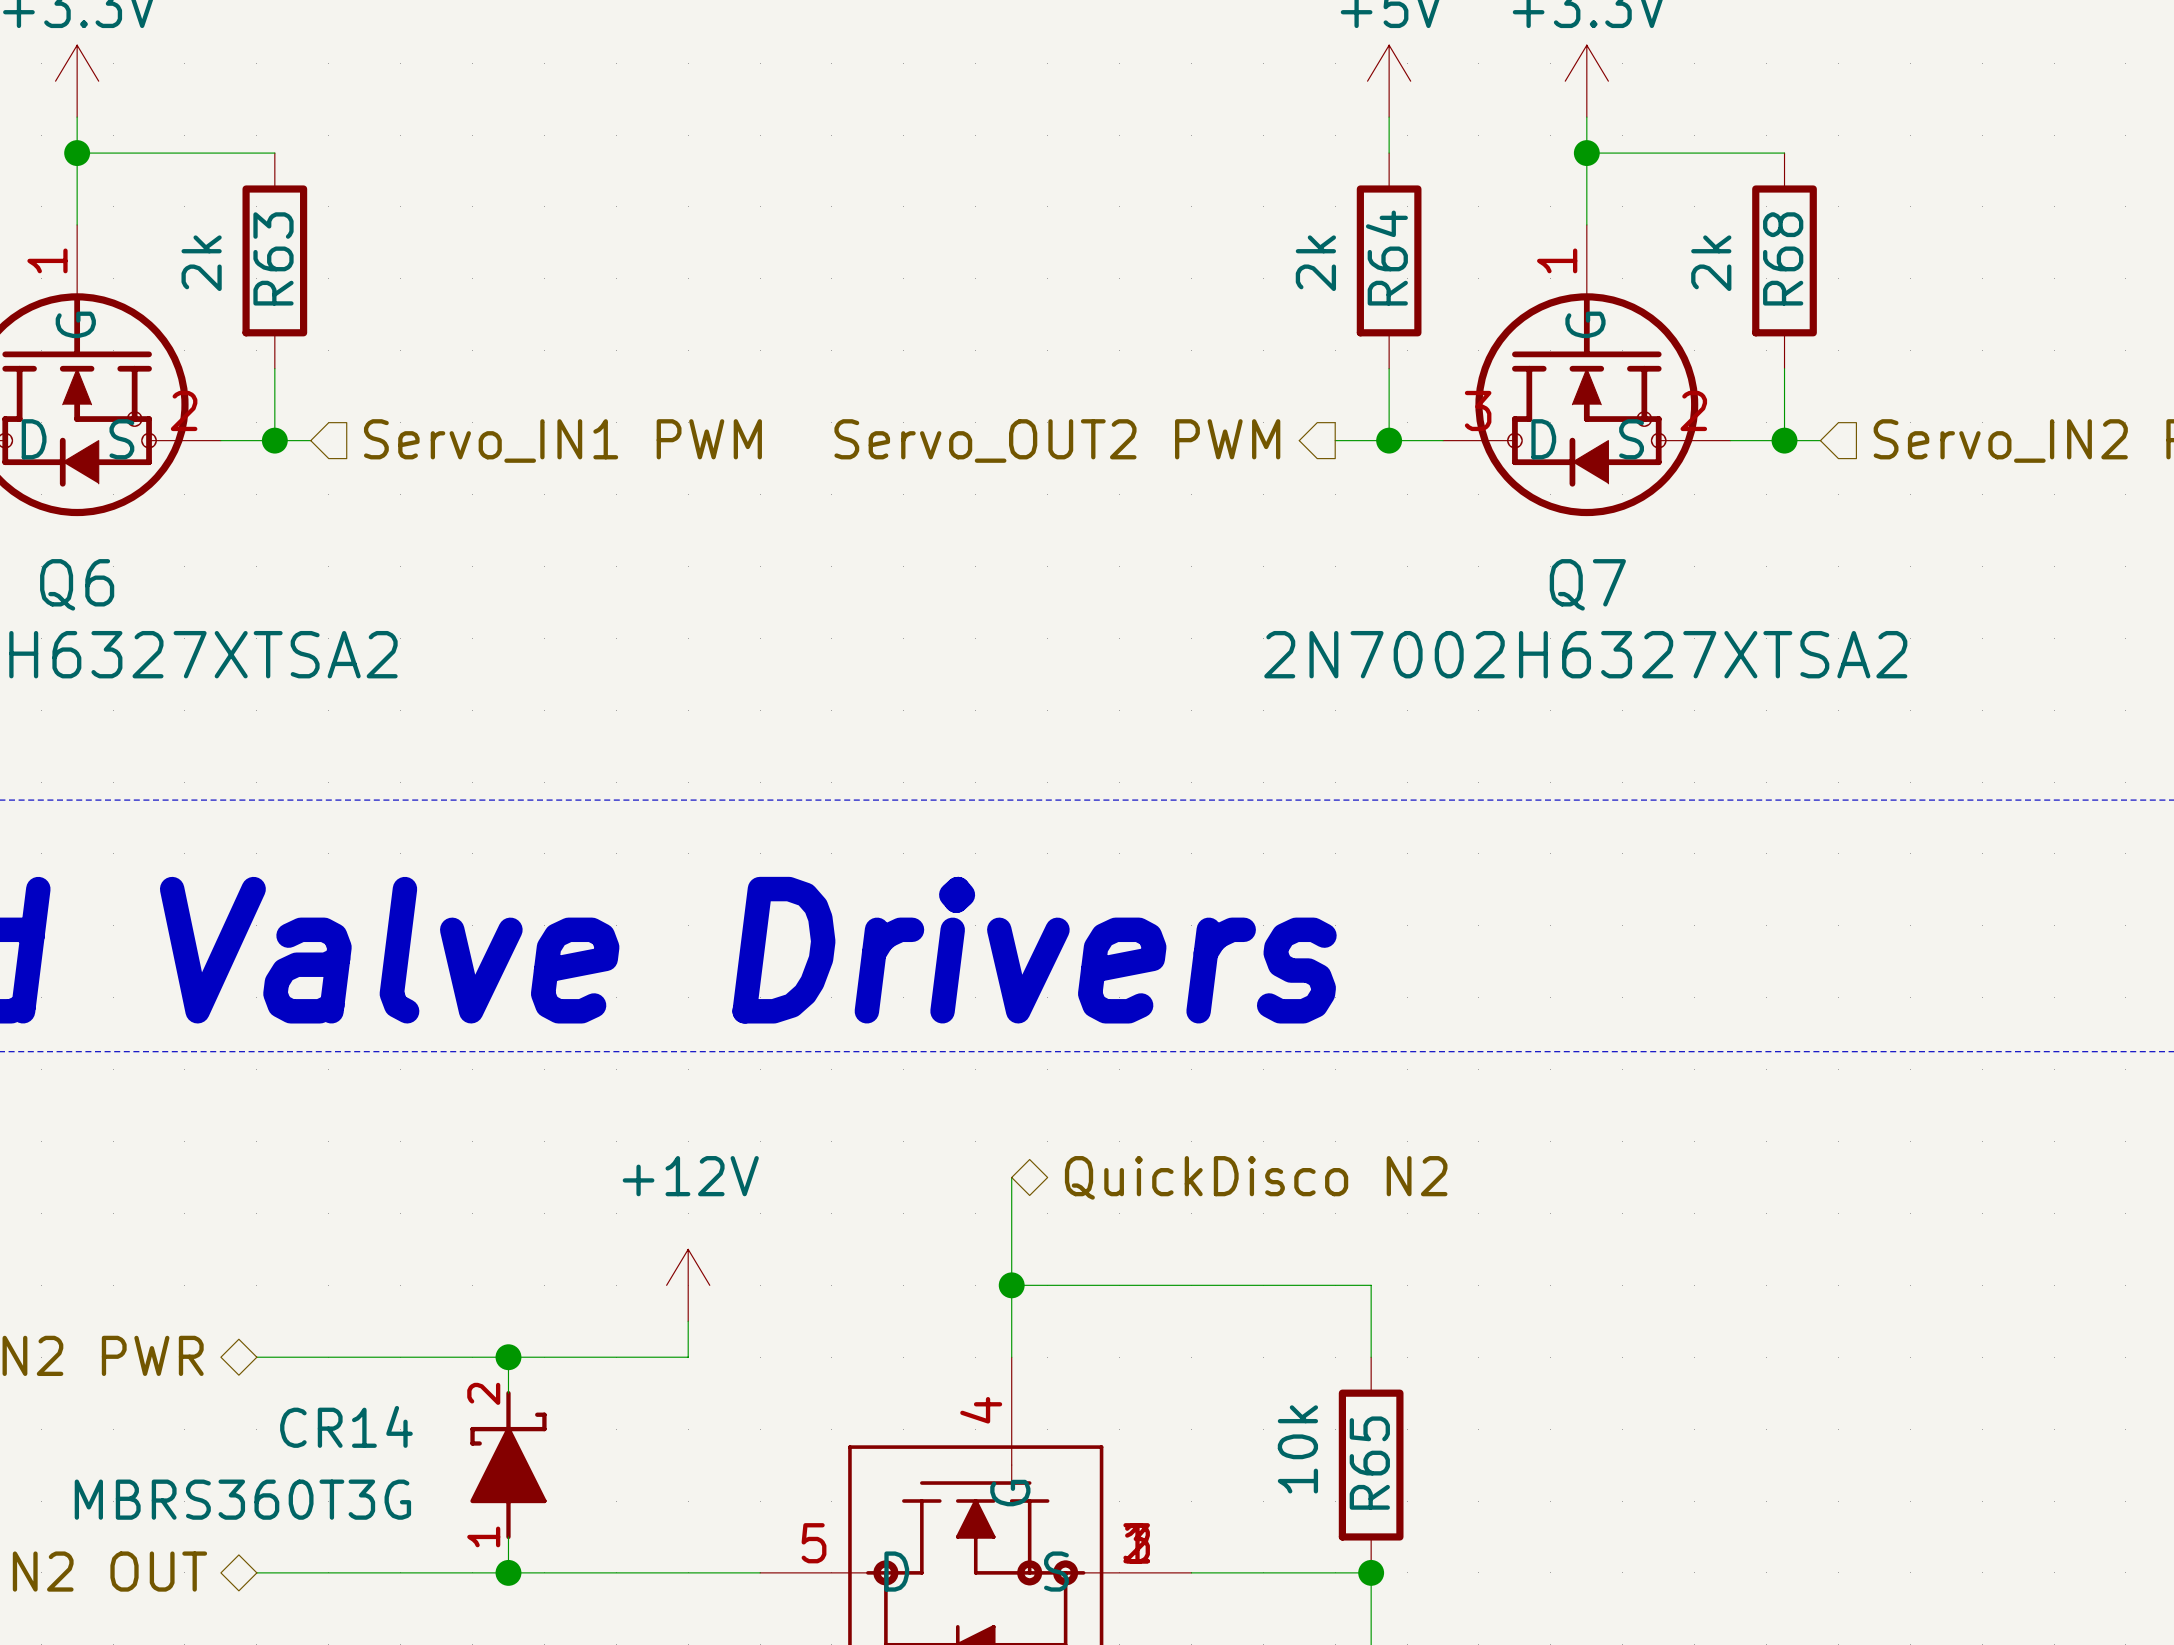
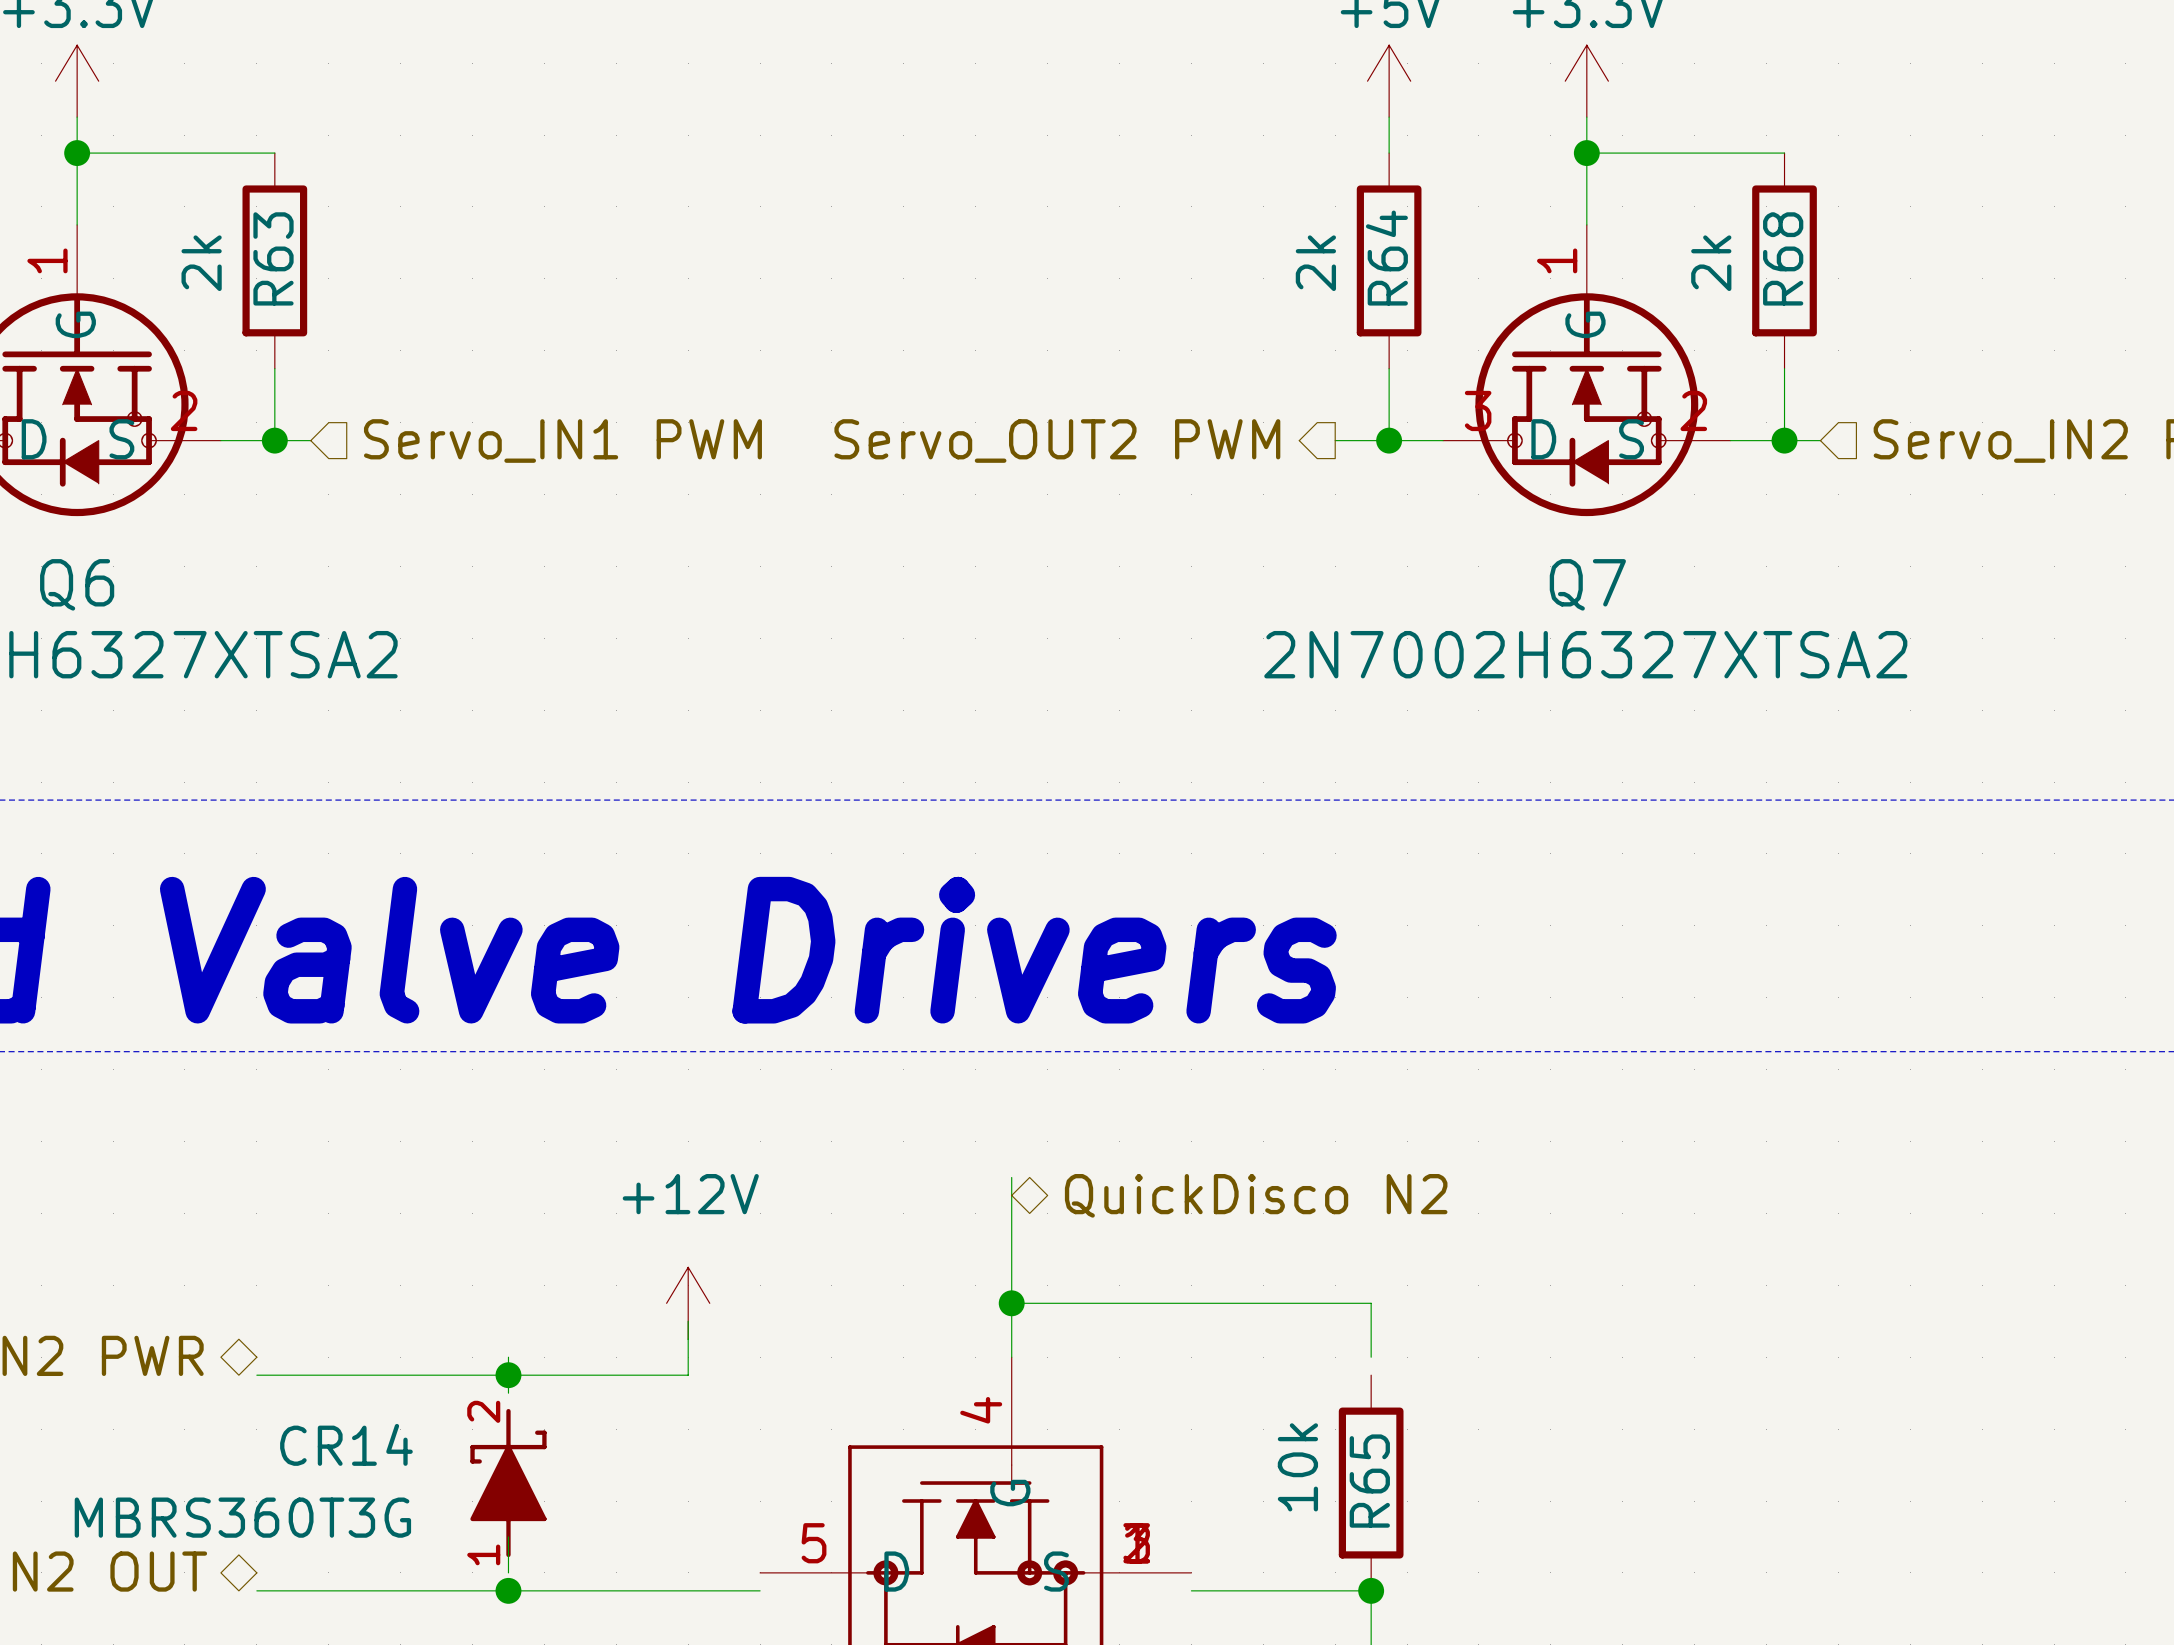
hierarchical label position: QuickDisco N2 (1256, 1177) -> QuickDisco N2 (1256, 1195)
power symbol position: +12V (688, 1285) -> +12V (688, 1303)
wire: (1011, 1285) (1371, 1285) (1371, 1303) -> (1011, 1303) (1371, 1303)
junction position: (1011, 1285) -> (1011, 1303)
wire: (256, 1357) (688, 1357) -> (256, 1375) (688, 1375) (688, 1357)
junction position: (508, 1357) -> (508, 1375)
CR14 position: (508, 1465) -> (508, 1483)
R65 position: (1371, 1465) -> (1371, 1483)
wire: (256, 1572) (760, 1572) -> (256, 1590) (760, 1590)
junction position: (508, 1572) -> (508, 1590)
wire: (1191, 1572) (1371, 1572) (1371, 1590) -> (1191, 1590) (1371, 1590)
junction position: (1371, 1572) -> (1371, 1590)

